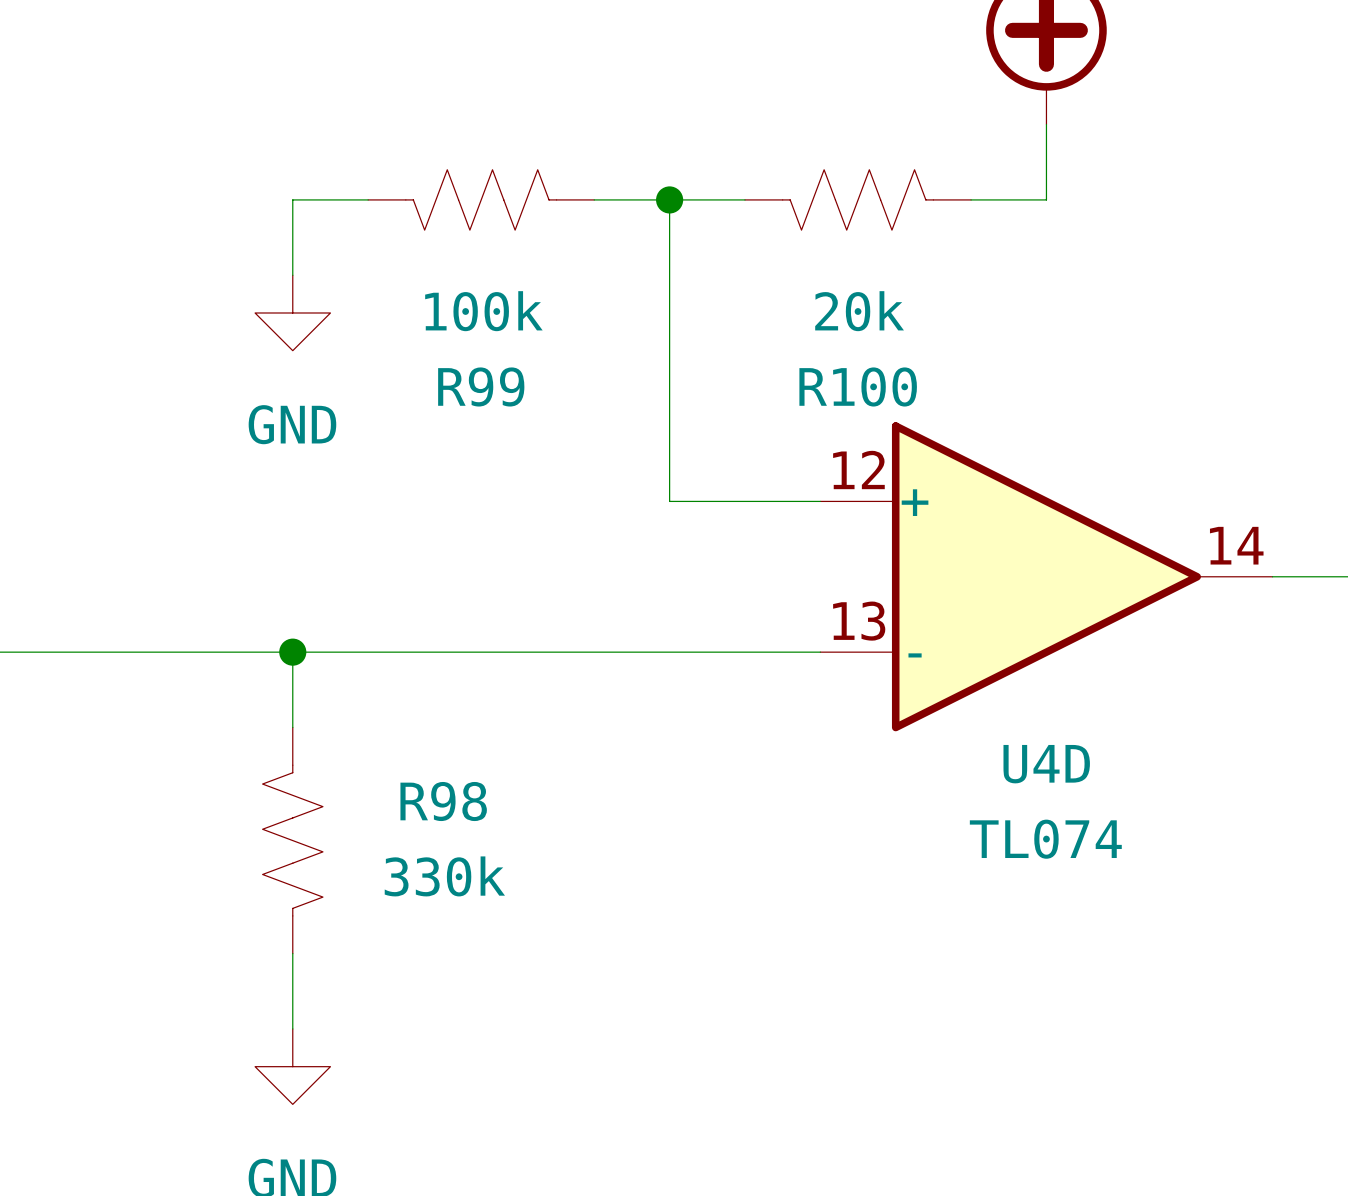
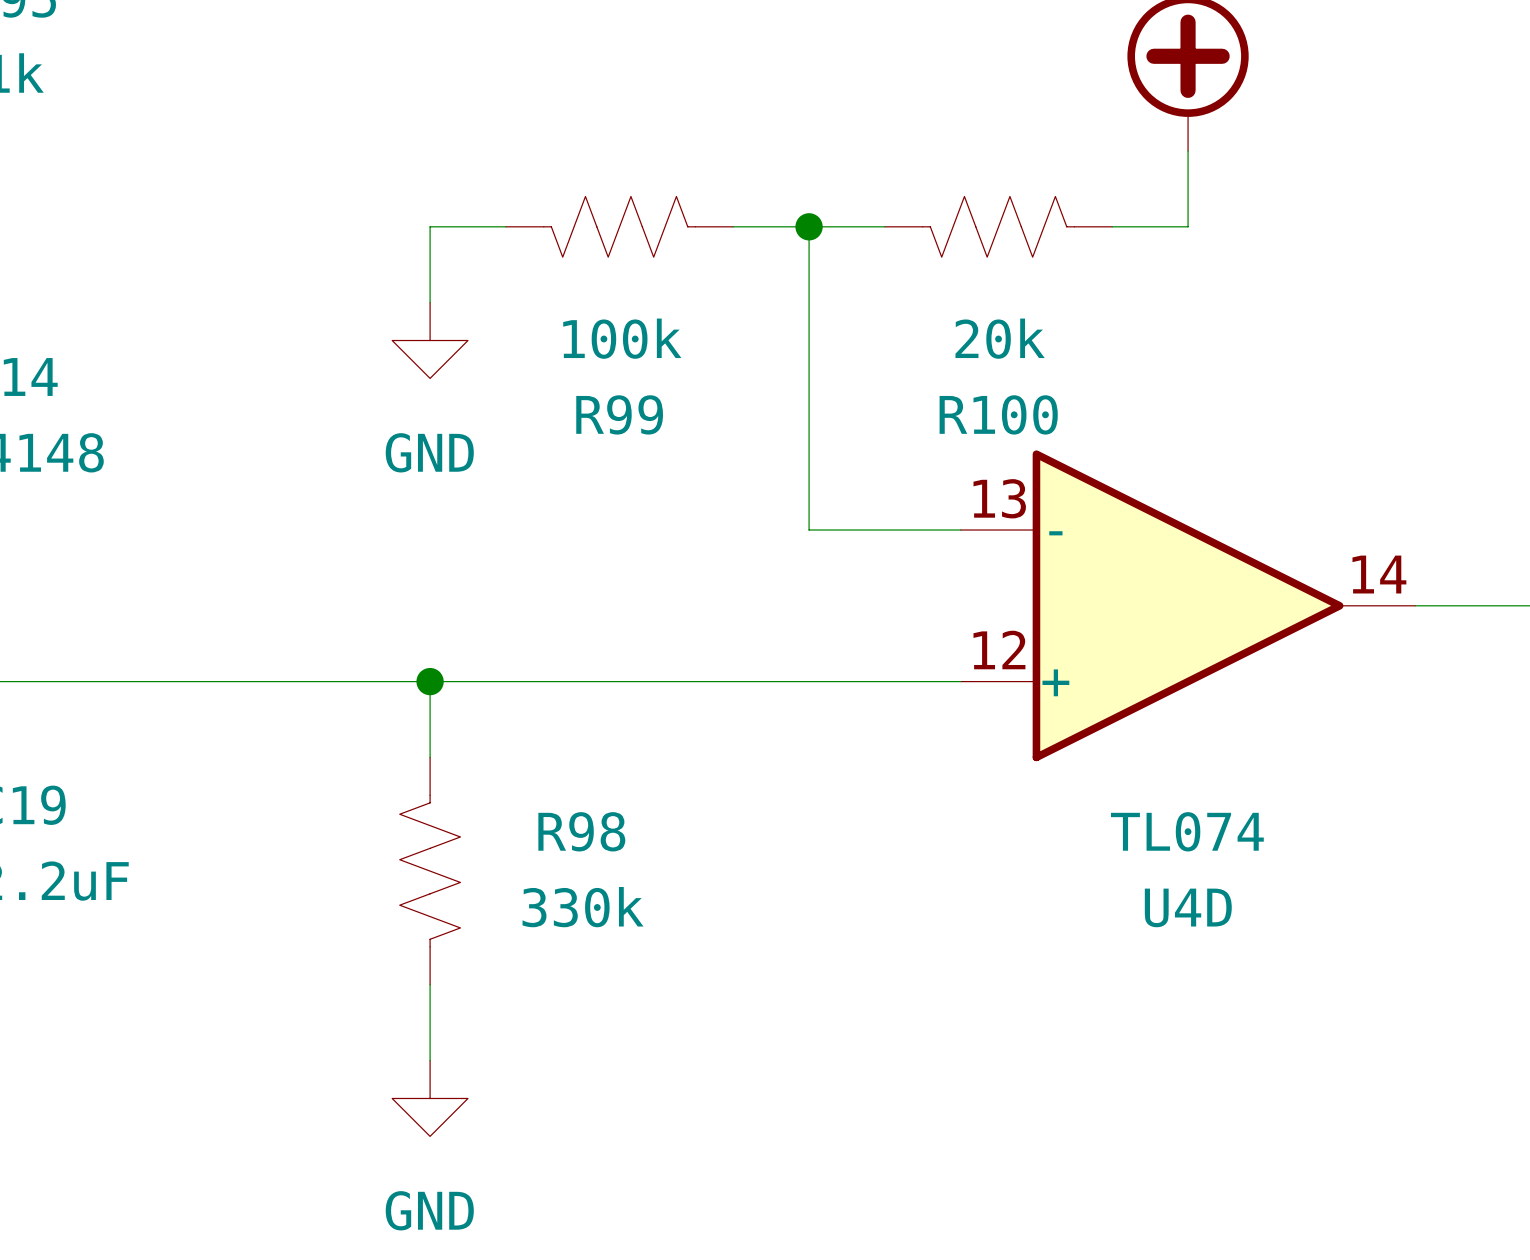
U4D flip: as is (1046, 576) -> up-down (1188, 605)
U4D name position: U4D (1046, 764) -> U4D (1188, 907)

